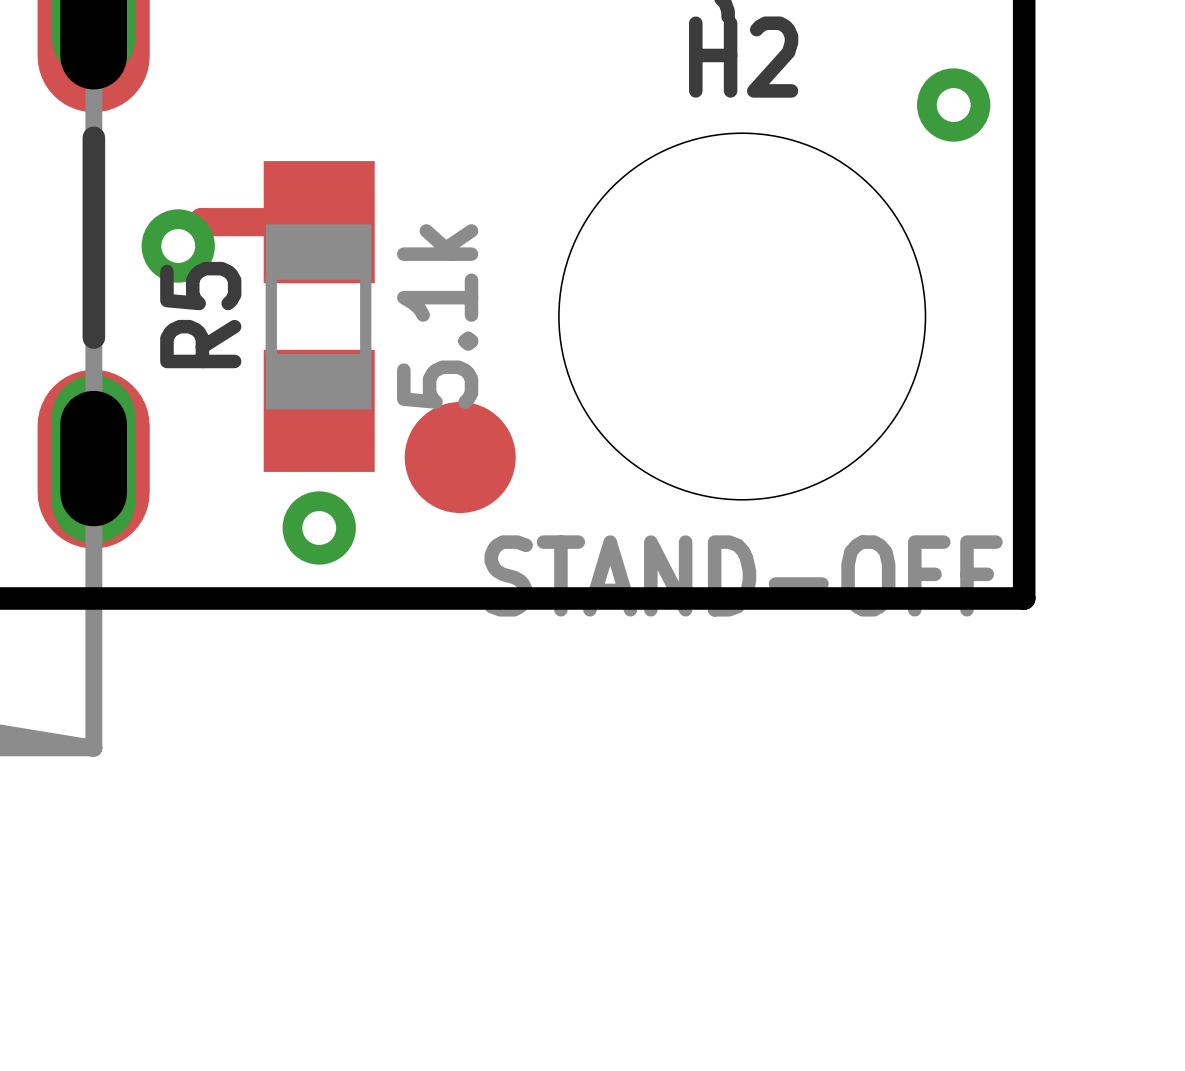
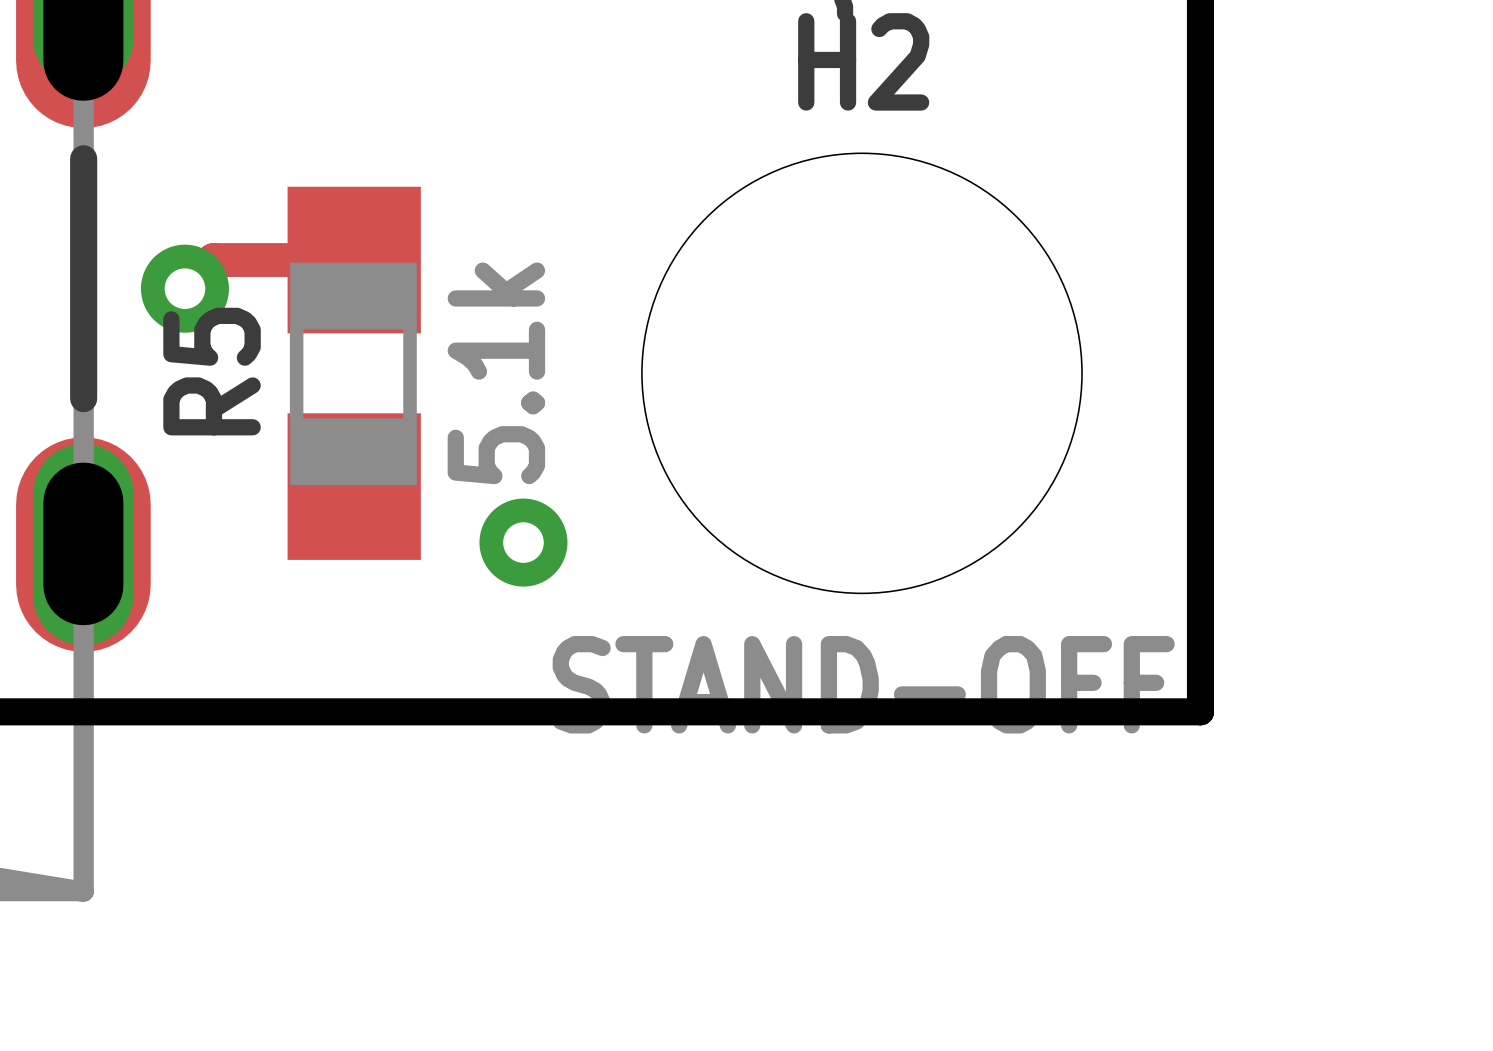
via: (953, 105) -> none
part: (460, 457) -> none
via position: (319, 527) -> (523, 542)

